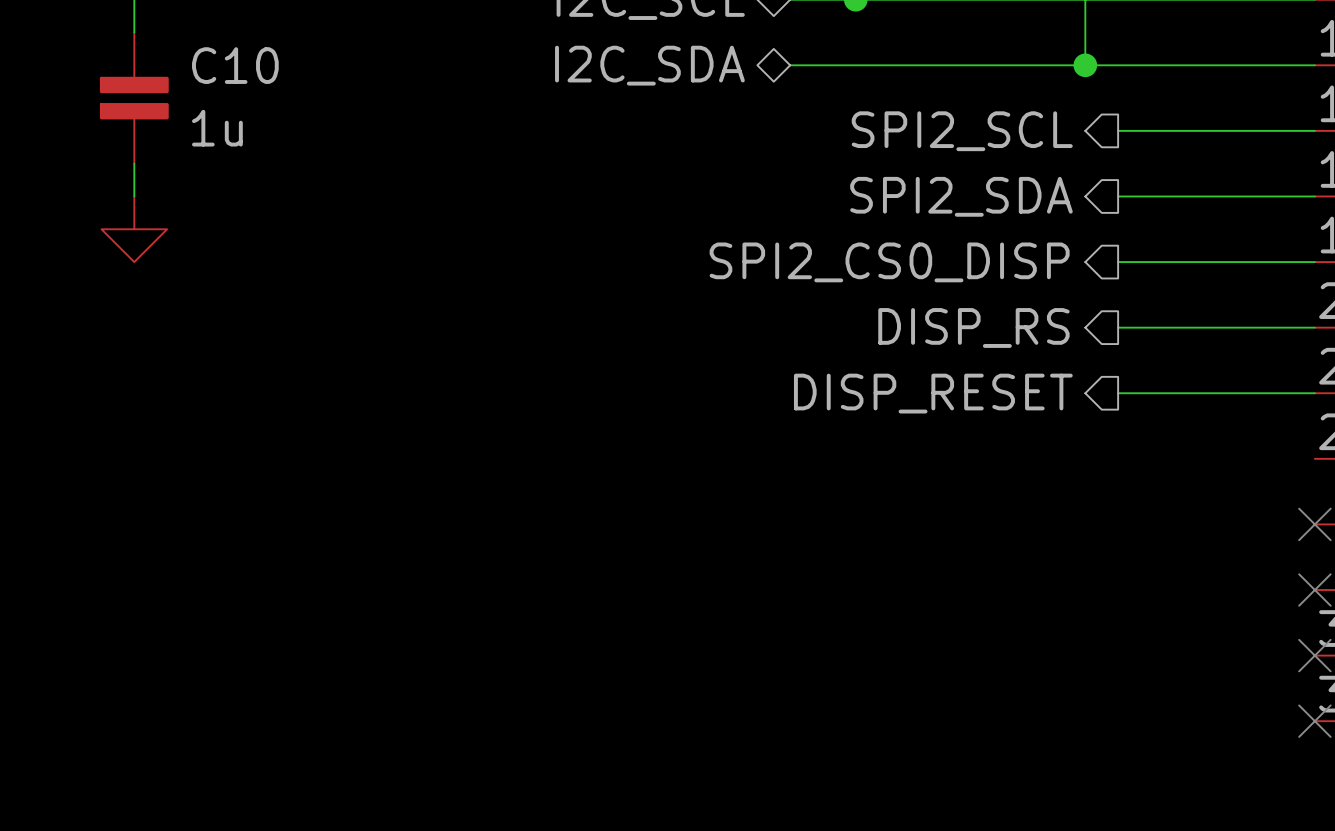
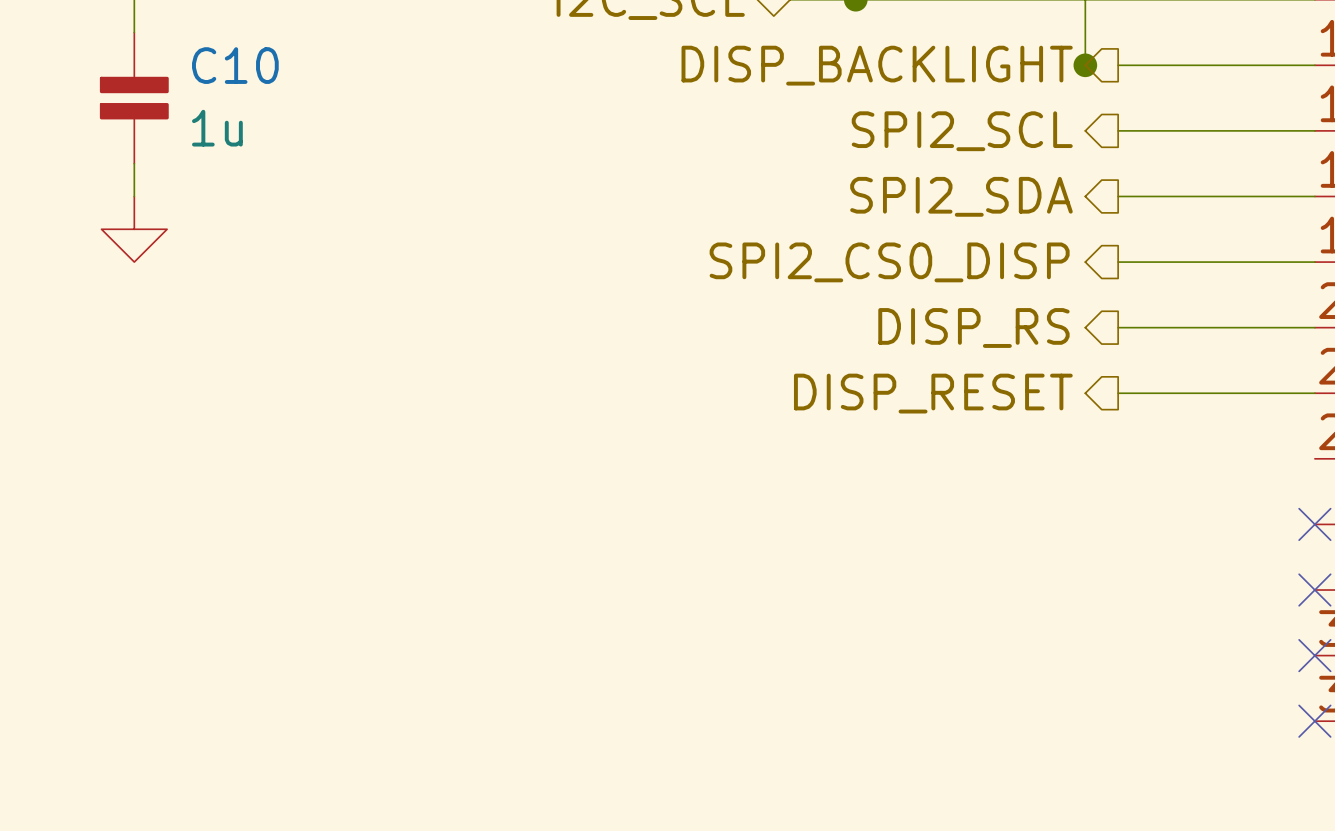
hierarchical label: I2C_SDA (649, 65) -> none
wire: (790, 65) (1118, 65) -> none
hierarchical label: none -> DISP_BACKLIGHT (877, 65)

